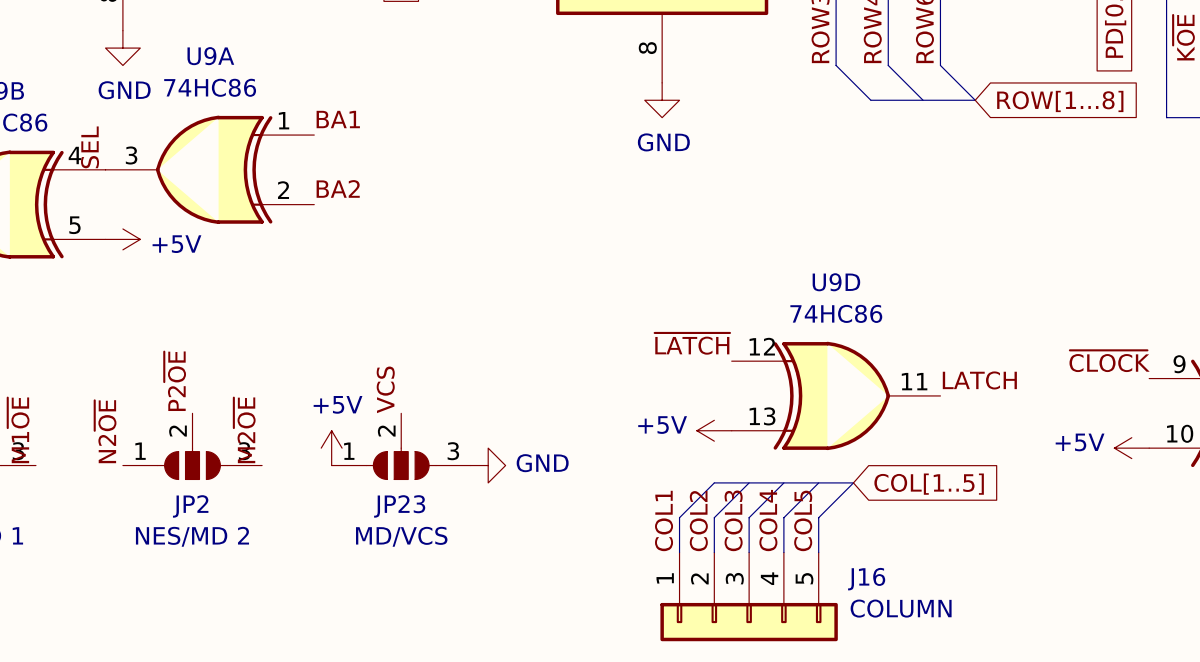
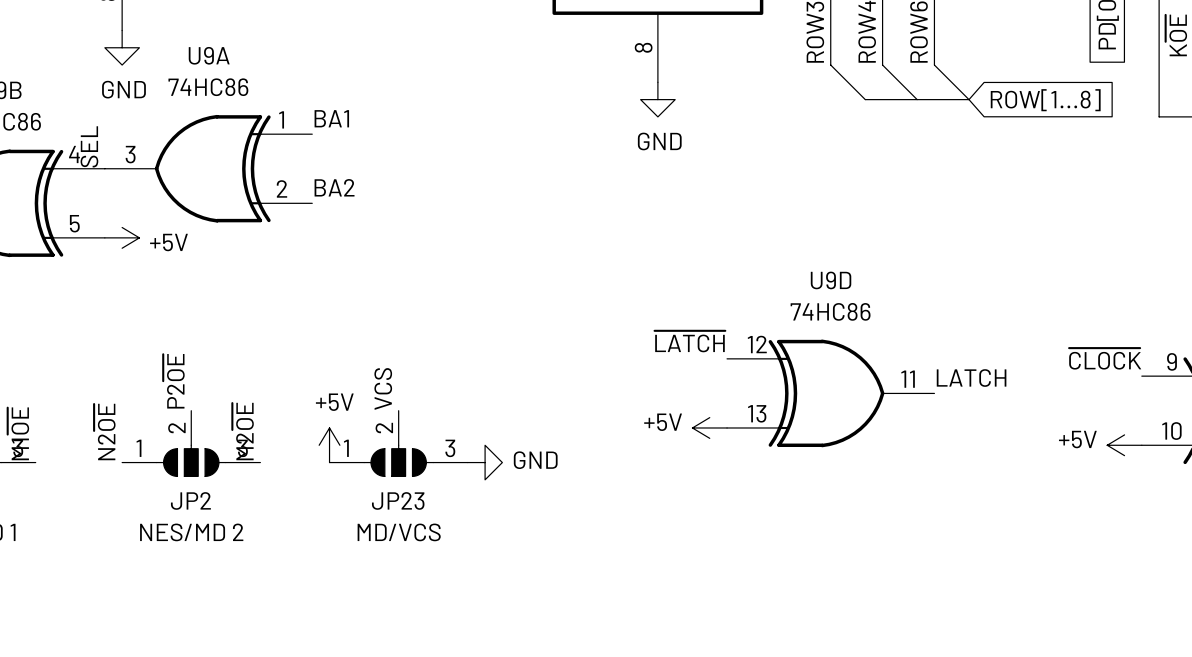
wire: (714, 482) (679, 517) (679, 552) -> none
bus: (714, 482) (853, 482) -> none
wire: (749, 482) (714, 517) (714, 552) -> none
wire: (783, 482) (749, 517) (749, 552) -> none
wire: (818, 482) (783, 517) (783, 552) -> none
wire: (853, 482) (818, 517) (818, 552) -> none
global label: COL[1..5] (929, 484) -> none
label: COL1 (664, 520) -> none
label: COL3 (733, 520) -> none
label: COL4 (768, 520) -> none
label: COL5 (803, 520) -> none
label: COL2 (698, 521) -> none
J16: COLUMN (749, 596) -> none

